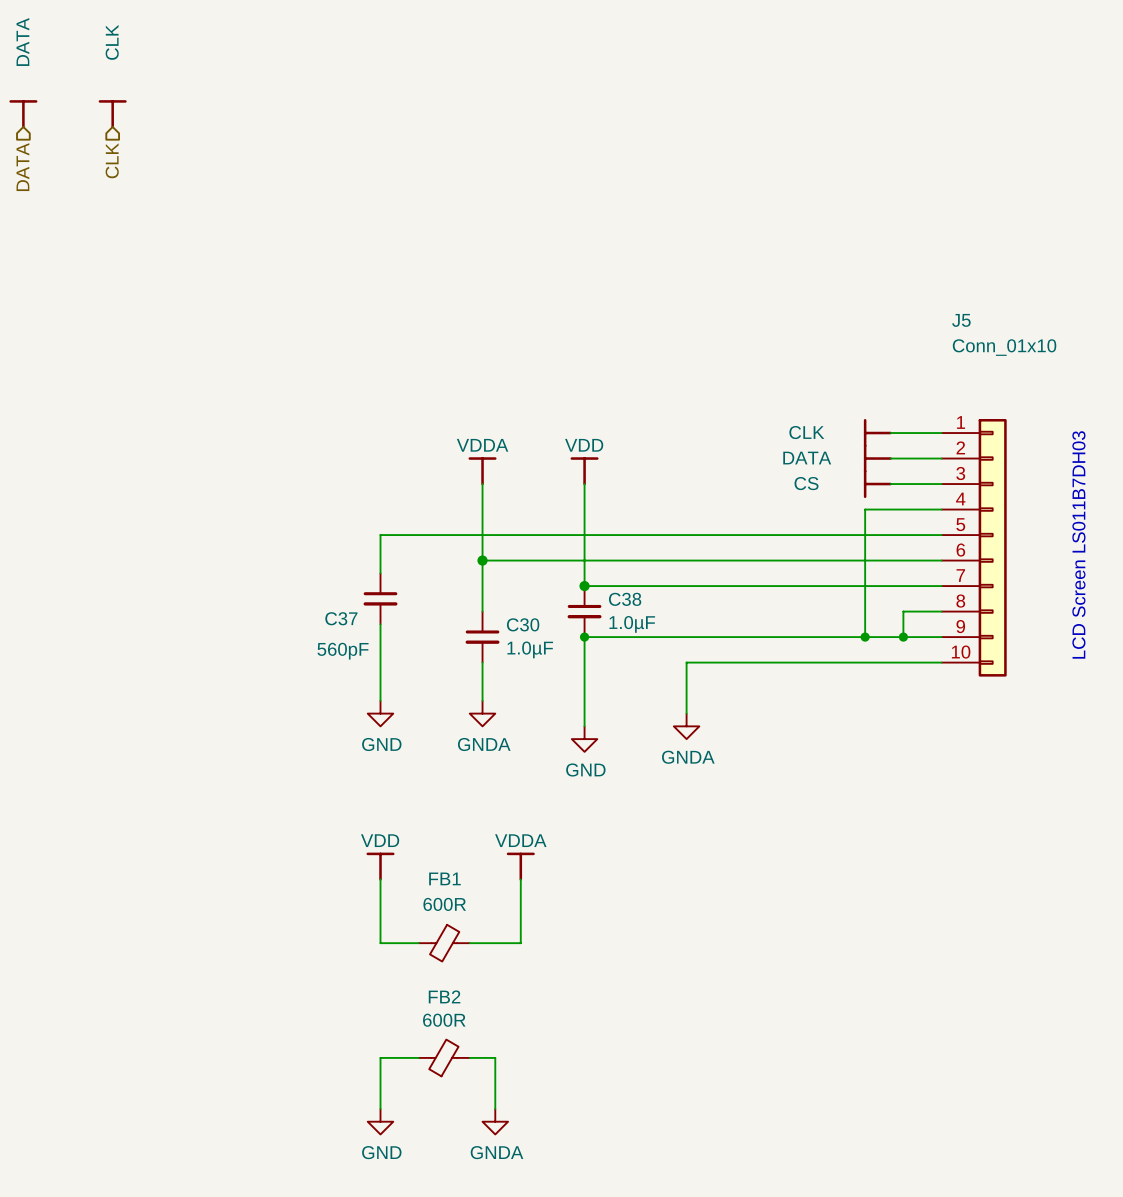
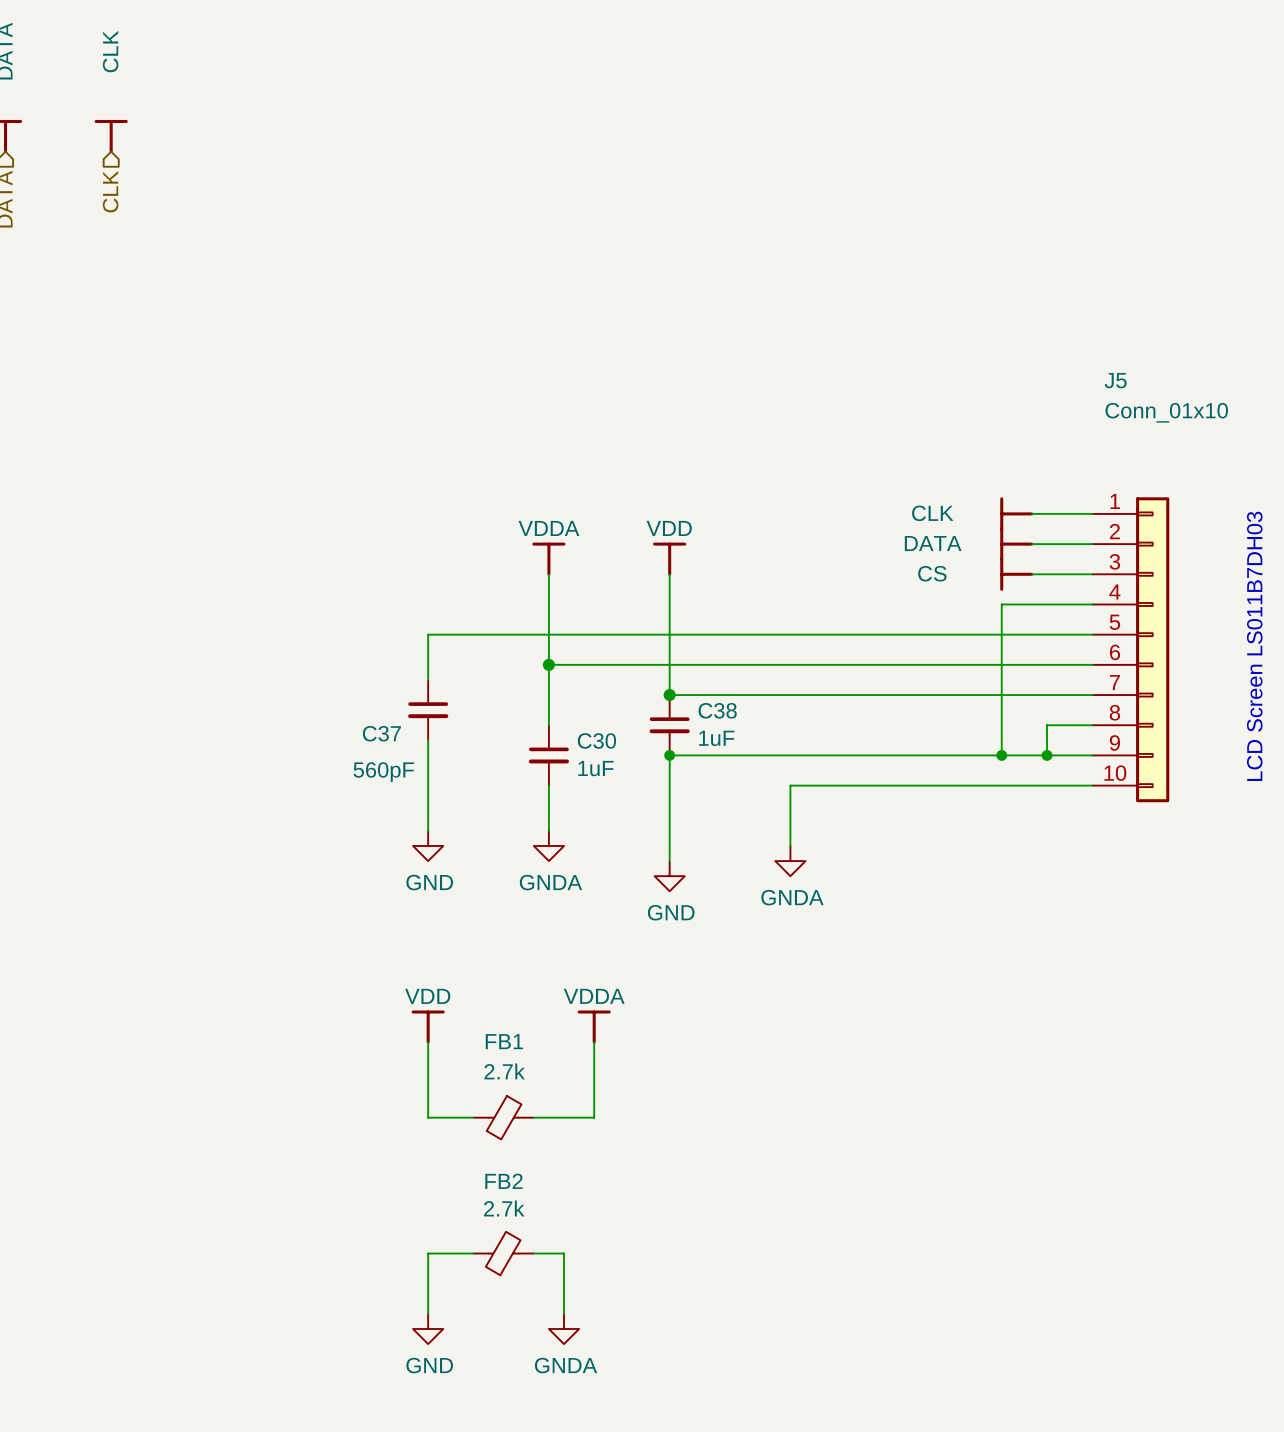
C38 value: 1.0µF (632, 624) -> 1uF (716, 738)
C30 value: 1.0µF (530, 649) -> 1uF (595, 768)
FB1 value: 600R (444, 904) -> 2.7k (504, 1071)
FB2 value: 600R (444, 1020) -> 2.7k (504, 1208)

